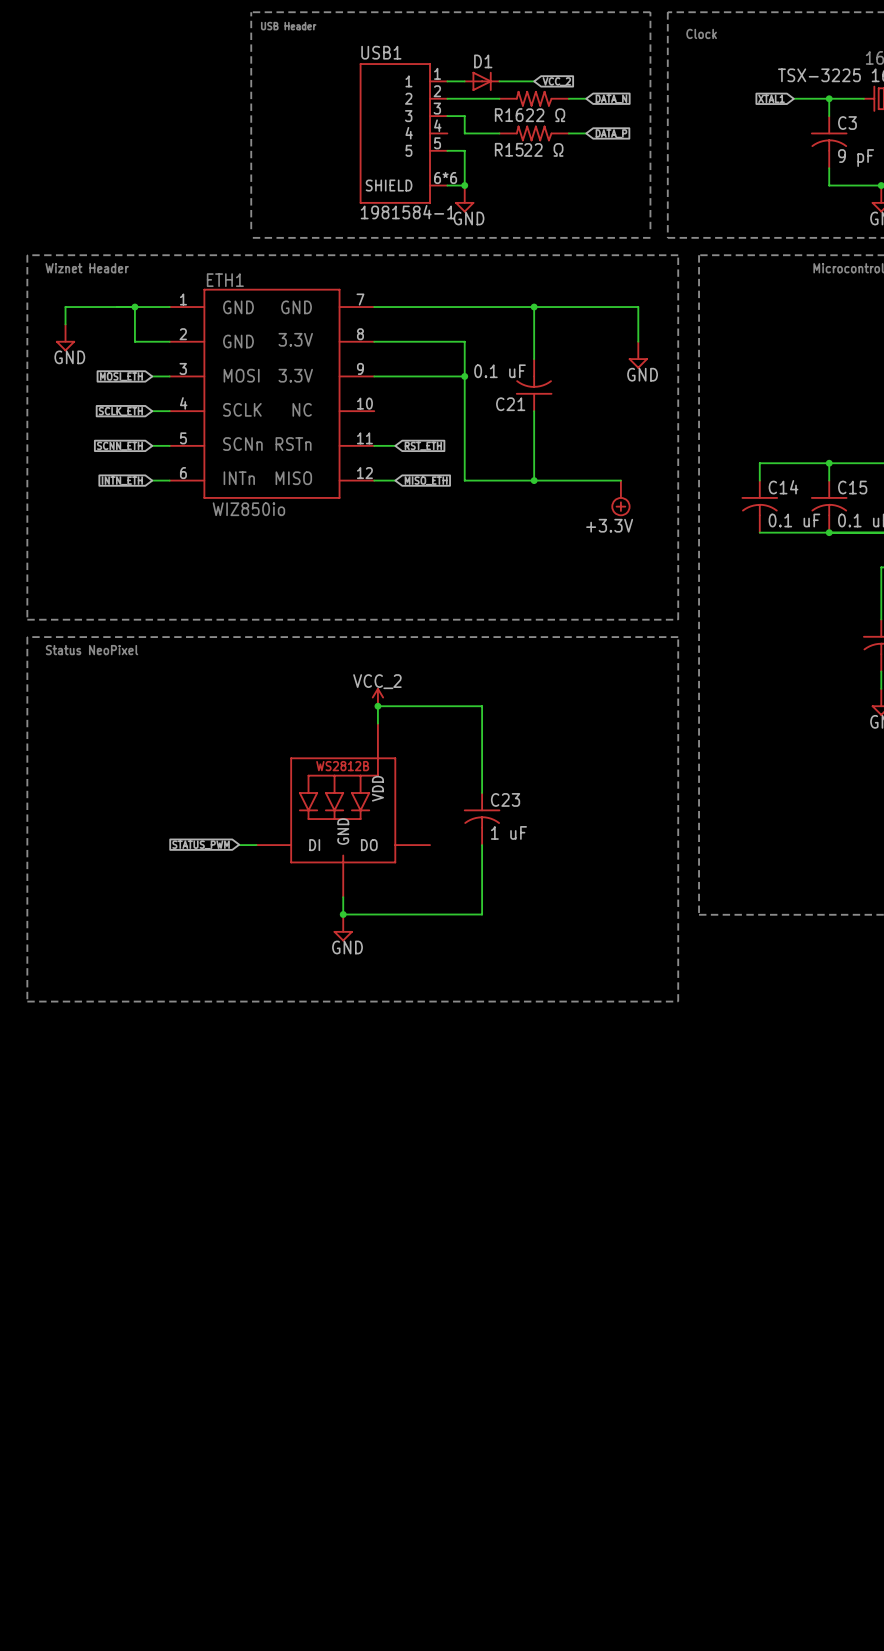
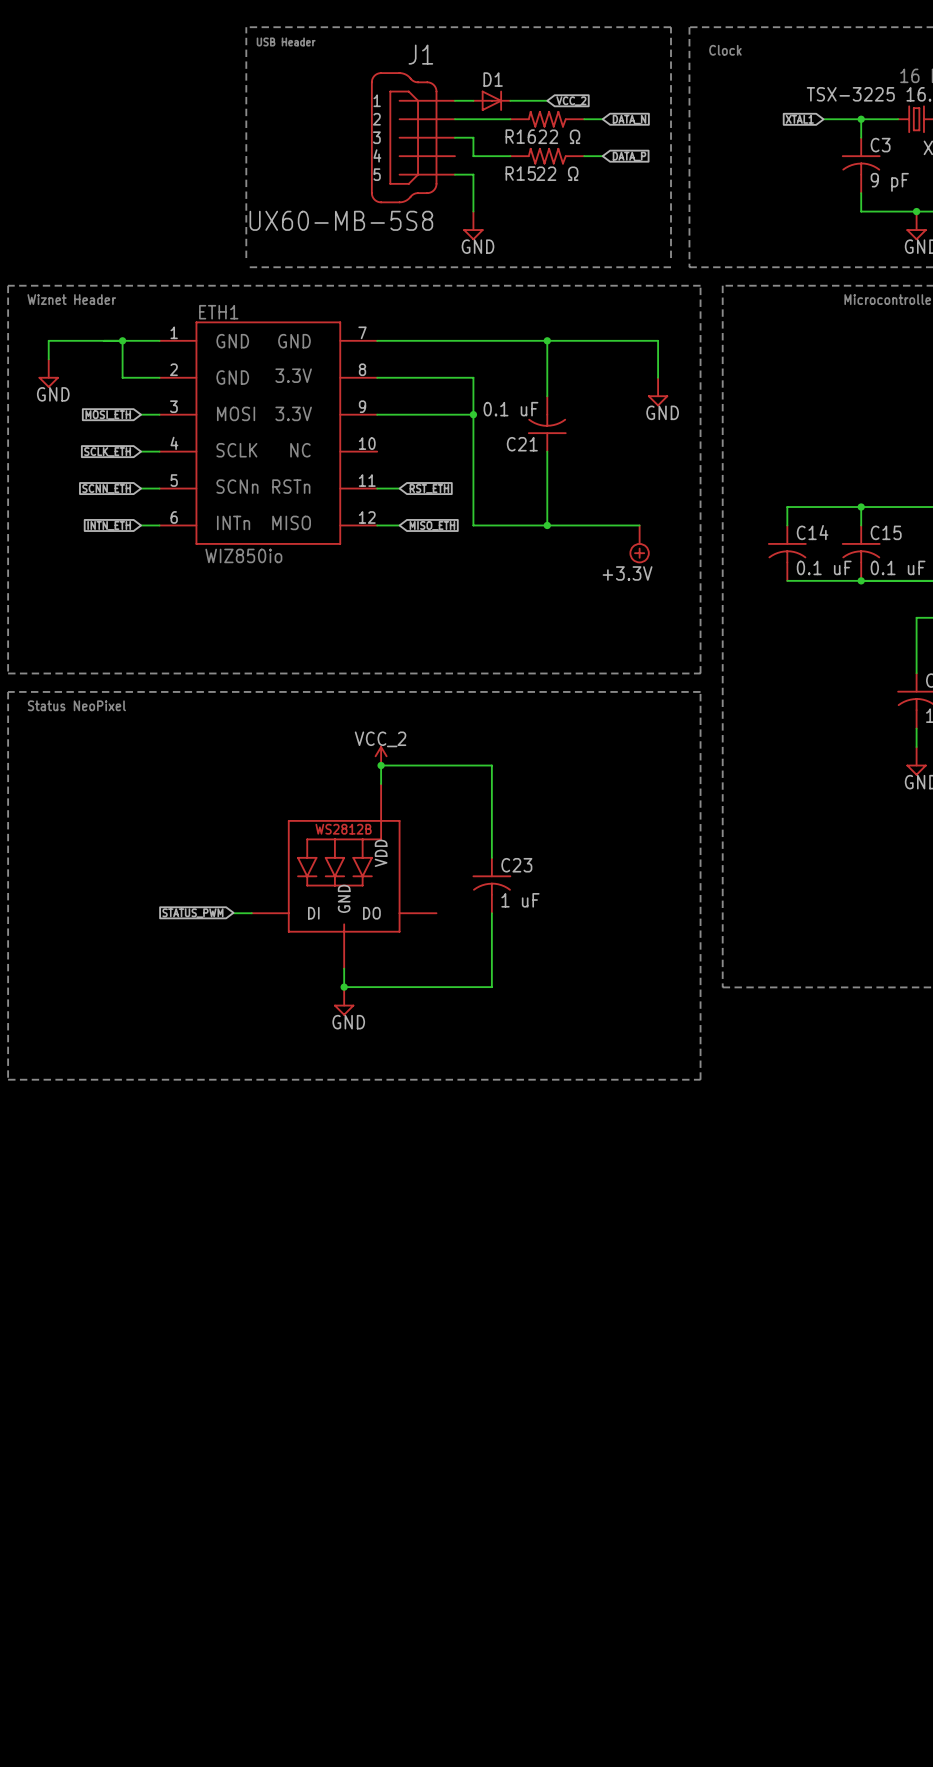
J1: none -> UX60-MB-5S8 (412, 137)
USB1: 1981584-1 (403, 133) -> none
wire: (447, 185) (464, 185) -> none
junction: (464, 185) -> none

